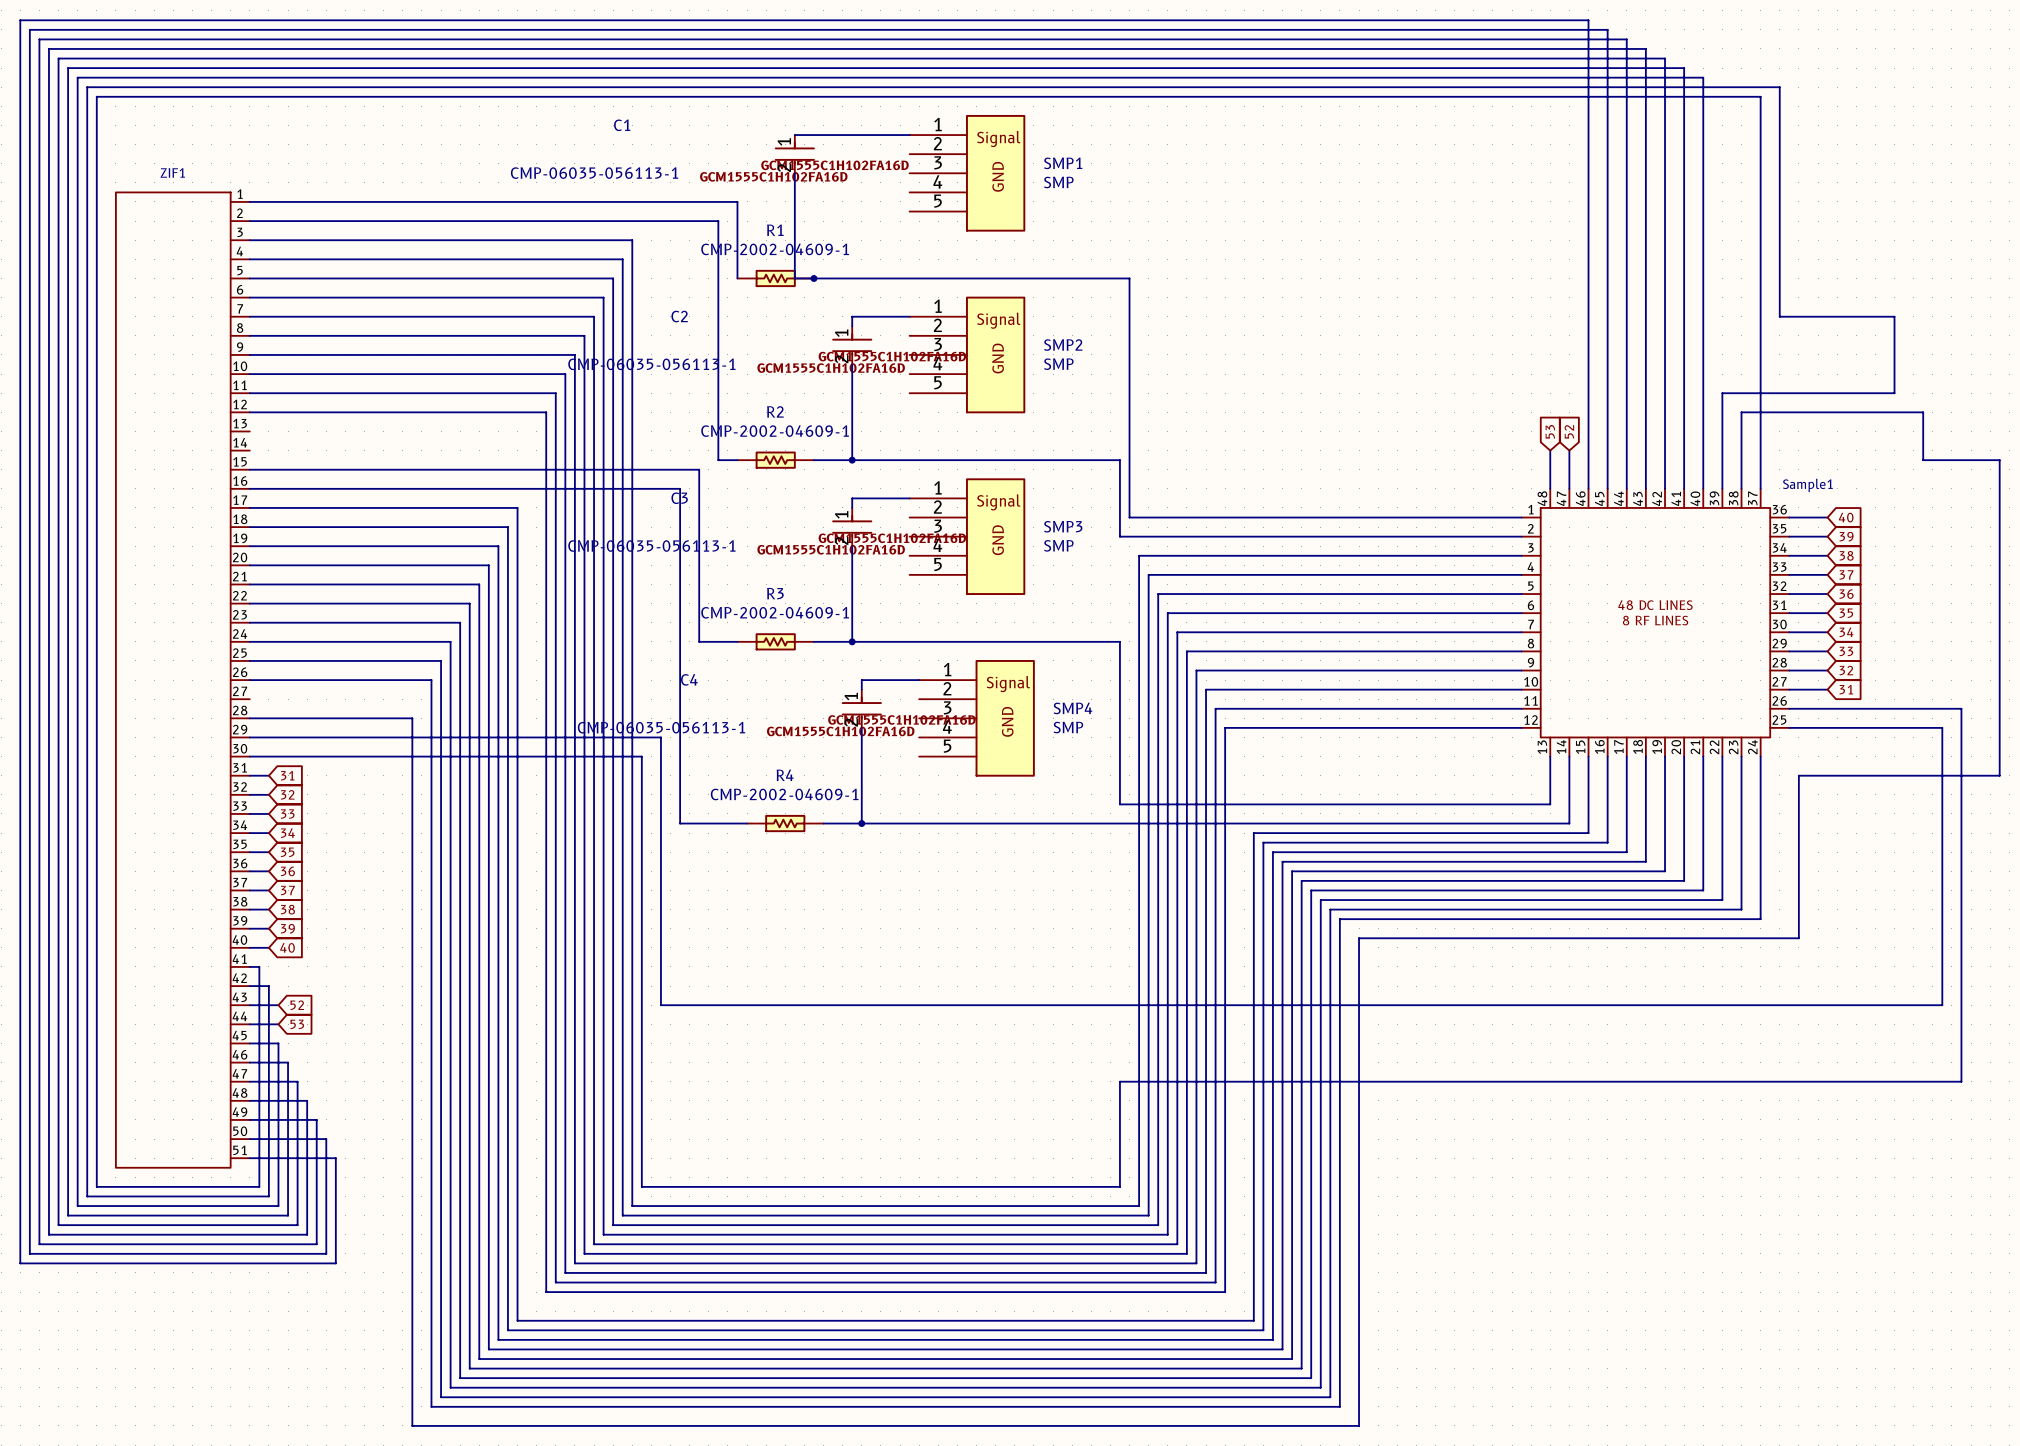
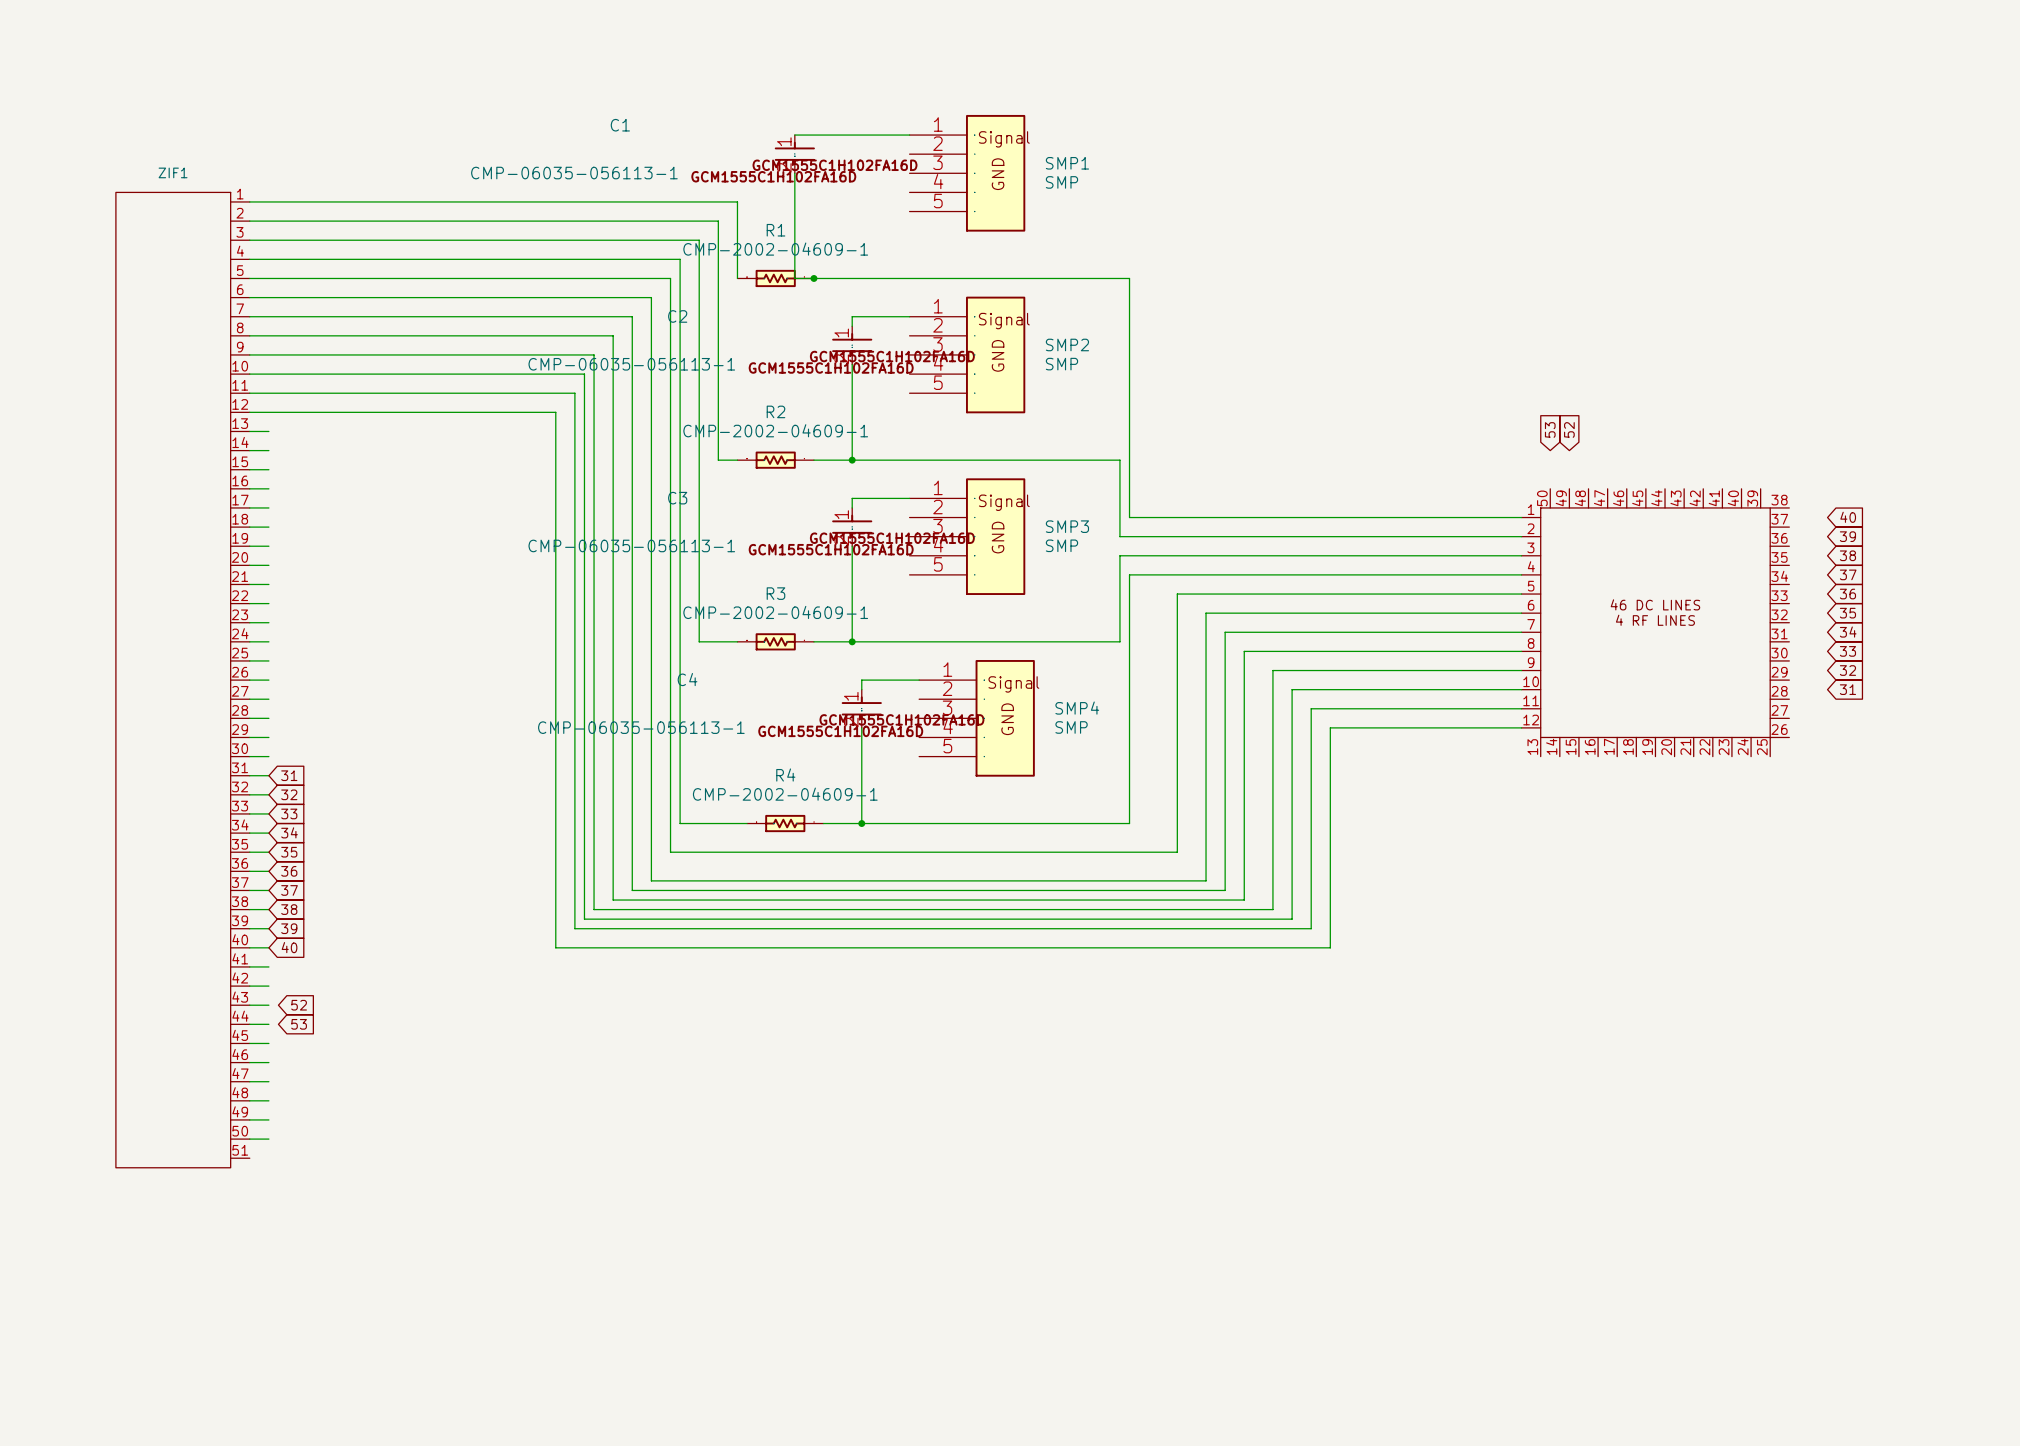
wire: (632, 240) (632, 316) -> (594, 316) (632, 316)
wire: (622, 259) (622, 1215) (1148, 1215) (1148, 574) -> none
wire: (613, 278) (613, 335) -> (584, 335) (613, 335)
wire: none -> (613, 278) (670, 278) (670, 852) (1177, 852)
wire: (603, 297) (603, 1234) (1167, 1234) (1167, 613) (1206, 613) -> none
wire: (594, 316) (594, 354) -> (574, 354) (594, 354)
wire: (584, 335) (584, 374) -> (565, 374) (584, 374)
wire: (574, 354) (574, 393) -> (555, 393) (574, 393)
wire: (565, 374) (565, 1272) (1206, 1272) (1206, 880) -> (603, 297) (651, 297) (651, 880) (1206, 880)
wire: (555, 393) (555, 412) -> (546, 412) (555, 412)
wire: (546, 412) (546, 1292) (1225, 1292) (1225, 890) -> none
wire: none -> (249, 431) (268, 431)
wire: none -> (249, 450) (268, 450)
wire: (1550, 450) (1550, 488) -> none
wire: (1569, 450) (1569, 488) -> none
wire: (268, 469) (699, 469) -> (632, 240) (699, 240) (699, 469)
wire: (268, 488) (680, 488) -> (622, 259) (680, 259) (680, 488)
wire: (1588, 488) (1588, 20) (20, 20) (20, 1263) (335, 1263) (335, 1158) (249, 1158) -> none
wire: (1607, 488) (1607, 29) (29, 29) (29, 1253) (326, 1253) (326, 1139) (268, 1139) -> none
wire: (1626, 488) (1626, 39) (39, 39) (39, 1244) (316, 1244) (316, 1119) (268, 1119) -> none
wire: (1645, 488) (1645, 48) (48, 48) (48, 1234) (307, 1234) (307, 1100) (268, 1100) -> none
wire: (1665, 488) (1665, 58) (58, 58) (58, 1225) (297, 1225) (297, 1081) (268, 1081) -> none
wire: (1684, 488) (1684, 68) (68, 68) (68, 1215) (288, 1215) (288, 1062) (268, 1062) -> none
wire: (1703, 488) (1703, 77) (77, 77) (77, 1206) (278, 1206) (278, 1043) (268, 1043) -> none
wire: (1722, 488) (1722, 393) (1894, 393) (1894, 316) (1779, 316) (1779, 87) (87, 87) (87, 1196) (268, 1196) (268, 986) -> none
wire: (1741, 488) (1741, 412) (1923, 412) (1923, 460) (1999, 460) (1999, 775) (1798, 775) (1798, 938) (1359, 938) (1359, 1425) (412, 1425) (412, 718) (268, 718) -> none
wire: (1760, 488) (1760, 96) (96, 96) (96, 1186) (259, 1186) (259, 966) -> (268, 966) (259, 966)
wire: (268, 507) (517, 507) (517, 1320) (1253, 1320) (1253, 833) (1588, 833) (1588, 756) -> none
wire: (1789, 517) (1827, 517) -> none
wire: (268, 527) (507, 527) (507, 1330) (1263, 1330) (1263, 842) (1607, 842) (1607, 756) -> none
wire: (1789, 536) (1827, 536) -> none
wire: (268, 546) (498, 546) (498, 1339) (1272, 1339) (1272, 909) -> none
wire: (1139, 555) (1139, 1206) (632, 1206) (632, 890) -> (1225, 890) (632, 890)
wire: (1789, 555) (1827, 555) -> none
wire: (268, 565) (488, 565) (488, 1349) (1282, 1349) (1282, 861) (1645, 861) (1645, 756) -> none
wire: (1789, 574) (1827, 574) -> none
wire: (268, 584) (479, 584) (479, 1359) (1292, 1359) (1292, 919) -> (584, 919) (1292, 919)
wire: (1177, 594) (1158, 594) (1158, 1225) (613, 1225) (613, 900) -> none
wire: (1789, 594) (1827, 594) -> none
wire: (268, 603) (469, 603) (469, 1368) (1301, 1368) (1301, 880) (1684, 880) (1684, 756) -> none
wire: (1789, 613) (1827, 613) -> none
wire: (268, 622) (460, 622) (460, 1378) (1311, 1378) (1311, 928) -> none
Sample1: (1655, 622) -> none
part: none -> (1655, 622)
wire: (1177, 632) (1225, 632) -> (1177, 632) (1177, 594)
wire: (1789, 632) (1827, 632) -> none
wire: (268, 641) (450, 641) (450, 1387) (1320, 1387) (1320, 900) (1722, 900) (1722, 756) -> none
wire: (1119, 641) (1119, 804) (1550, 804) (1550, 756) -> (1119, 641) (1119, 555) (1139, 555)
wire: (1244, 651) (1186, 651) (1186, 1253) (584, 1253) (584, 919) -> (1244, 651) (1244, 900) (613, 900)
wire: (1789, 651) (1827, 651) -> none
wire: (268, 660) (441, 660) (441, 1397) (1330, 1397) (1330, 947) -> none
wire: (1272, 670) (1196, 670) (1196, 1263) (574, 1263) (574, 928) -> (1311, 928) (574, 928)
wire: (1789, 670) (1827, 670) -> none
wire: (268, 680) (431, 680) (431, 1406) (1339, 1406) (1339, 919) (1760, 919) (1760, 756) -> none
wire: (1206, 689) (1292, 689) -> (1206, 689) (1206, 613)
wire: (1789, 689) (1827, 689) -> none
wire: none -> (249, 699) (268, 699)
wire: (1311, 708) (1215, 708) (1215, 1282) (555, 1282) (555, 947) -> (1330, 947) (555, 947)
wire: (1789, 708) (1961, 708) (1961, 1081) (1119, 1081) (1119, 1186) (641, 1186) (641, 756) (268, 756) -> none
wire: (1225, 727) (1330, 727) -> (1225, 727) (1225, 632)
wire: (1789, 727) (1942, 727) (1942, 1005) (660, 1005) (660, 737) (268, 737) -> none
wire: (1569, 756) (1569, 823) (1129, 823) -> (1148, 574) (1129, 574) (1129, 823)
wire: (1626, 756) (1626, 852) (1272, 852) -> (1272, 670) (1272, 852)
wire: (1665, 756) (1665, 871) (1292, 871) -> (1292, 689) (1292, 871)
wire: (1703, 756) (1703, 890) (1311, 890) -> (1311, 708) (1311, 890)
wire: (1741, 756) (1741, 909) (1330, 909) -> (1330, 727) (1330, 909)
wire: (1177, 852) (1177, 1244) (594, 1244) (594, 909) -> (1272, 909) (594, 909)
wire: (268, 1005) (278, 1005) -> none
wire: (268, 1024) (278, 1024) -> none

